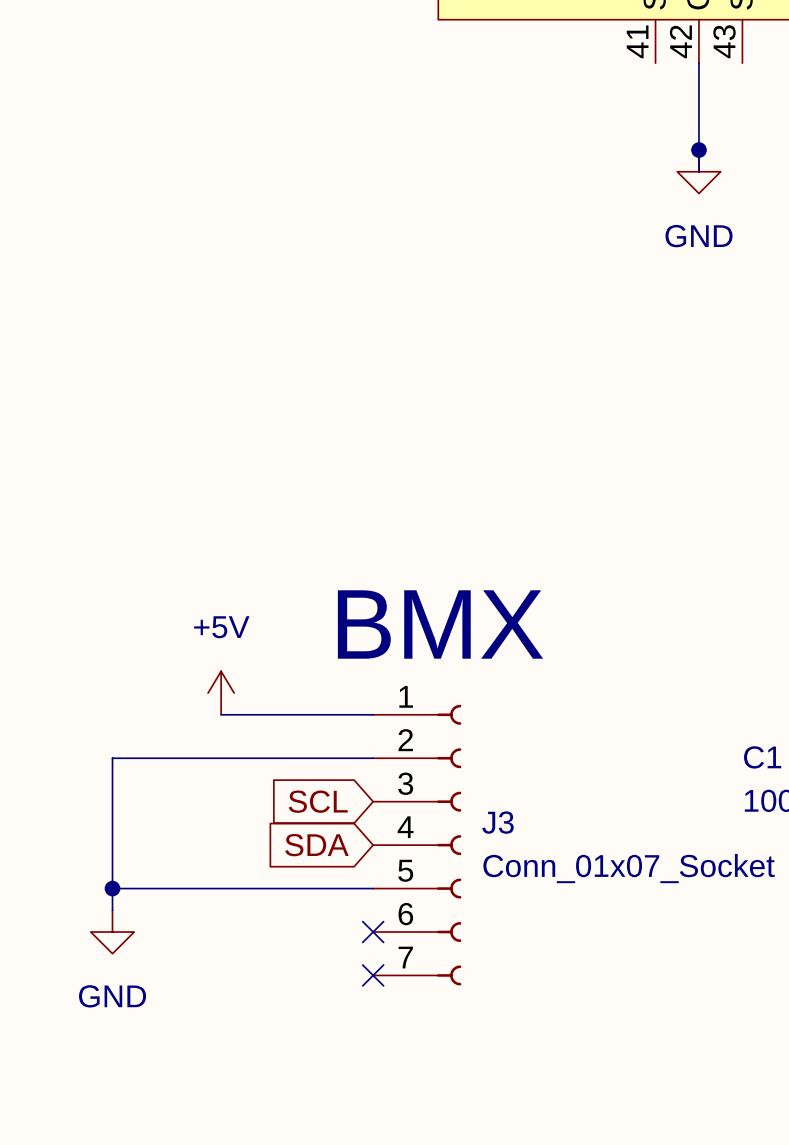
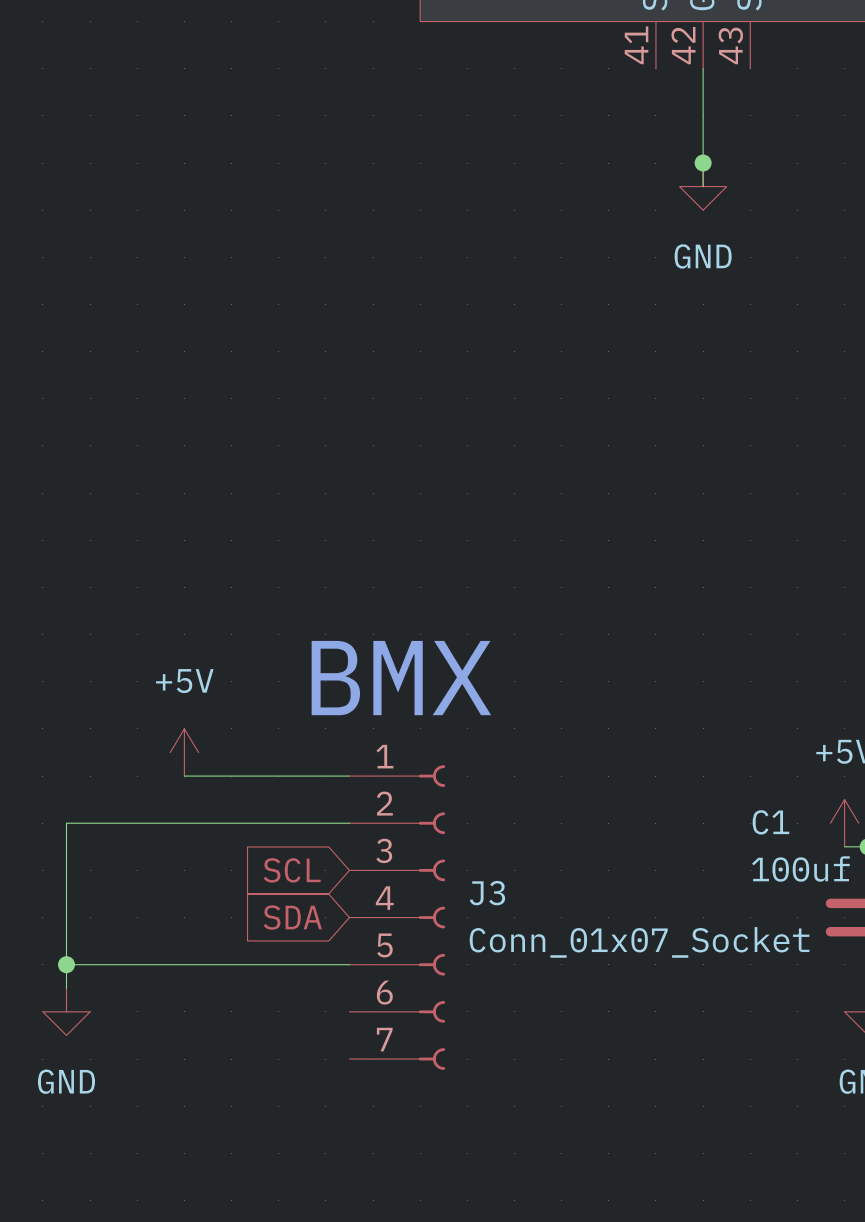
no-connect mark: (373, 932) -> none
no-connect mark: (373, 975) -> none

